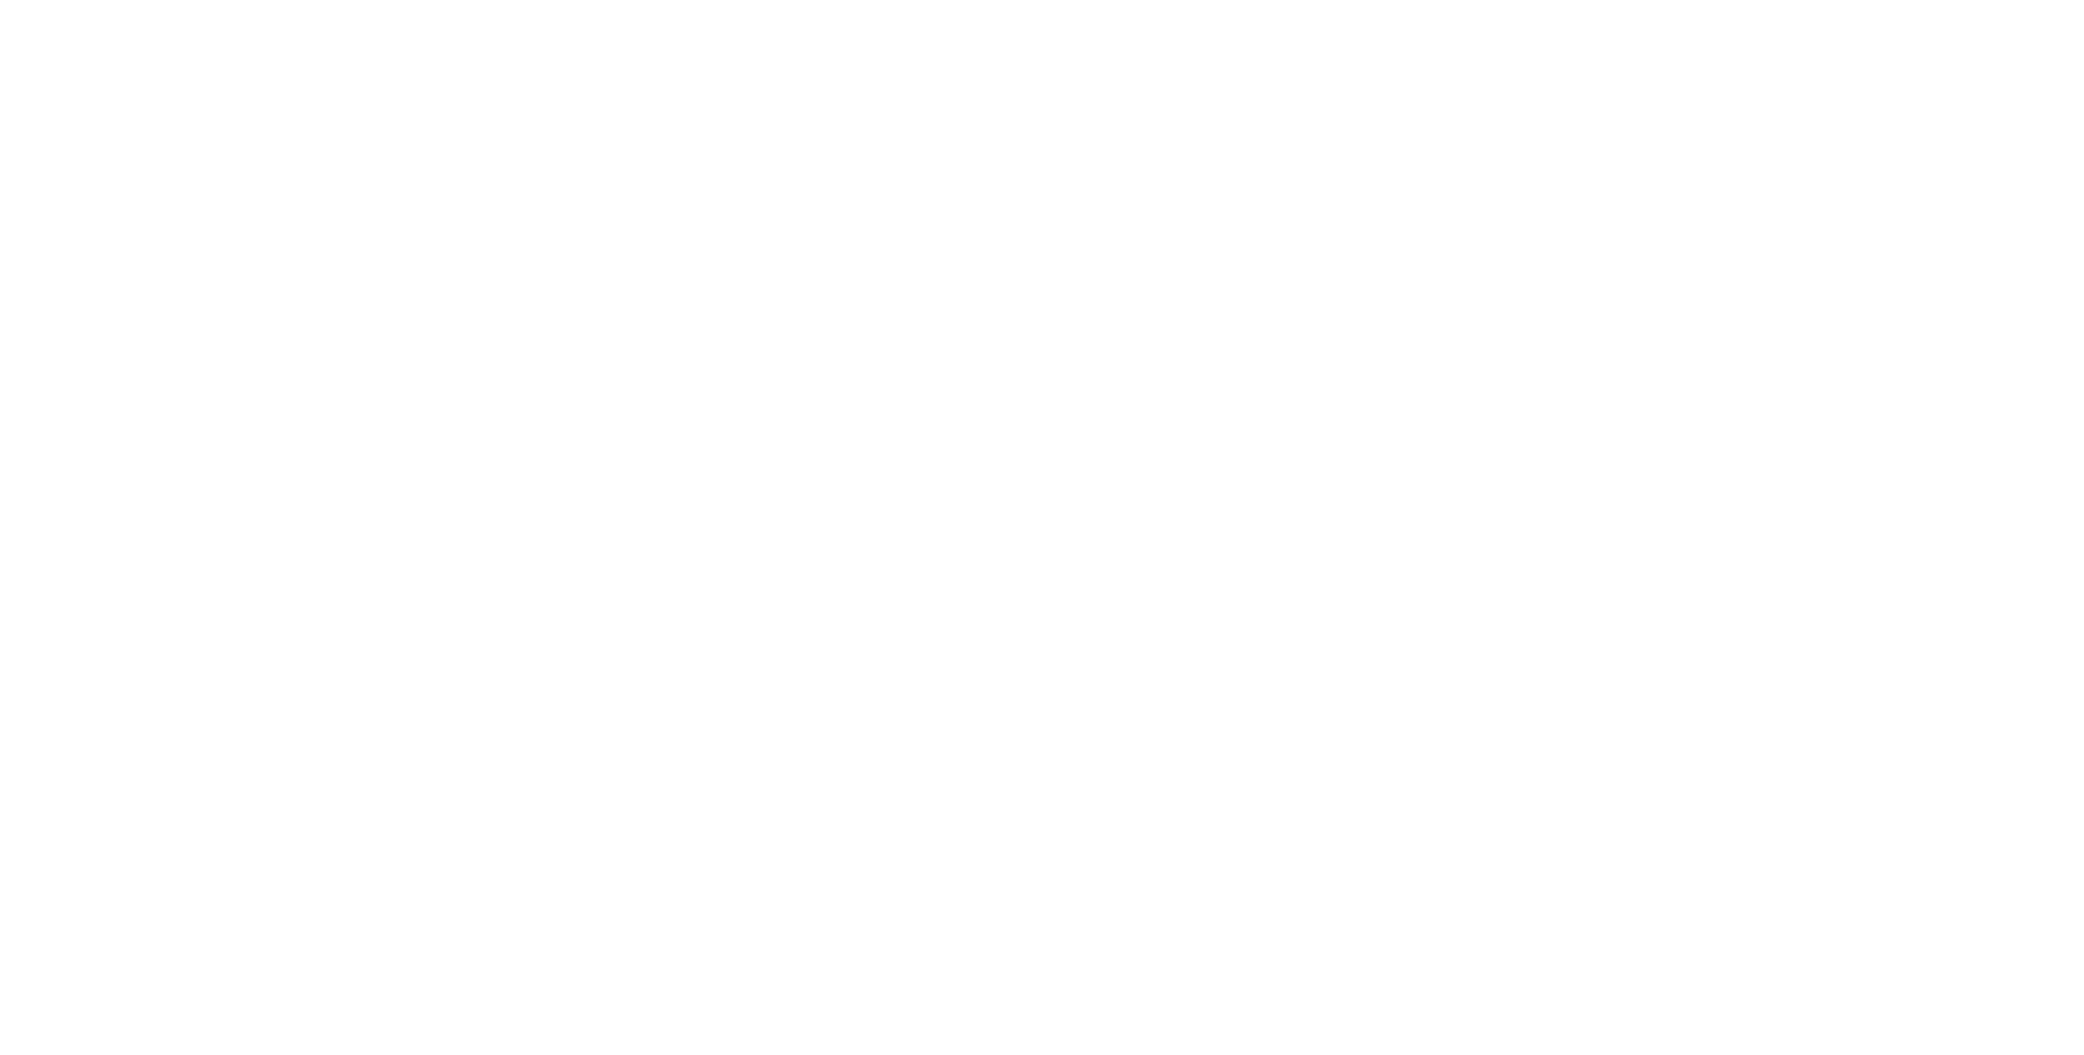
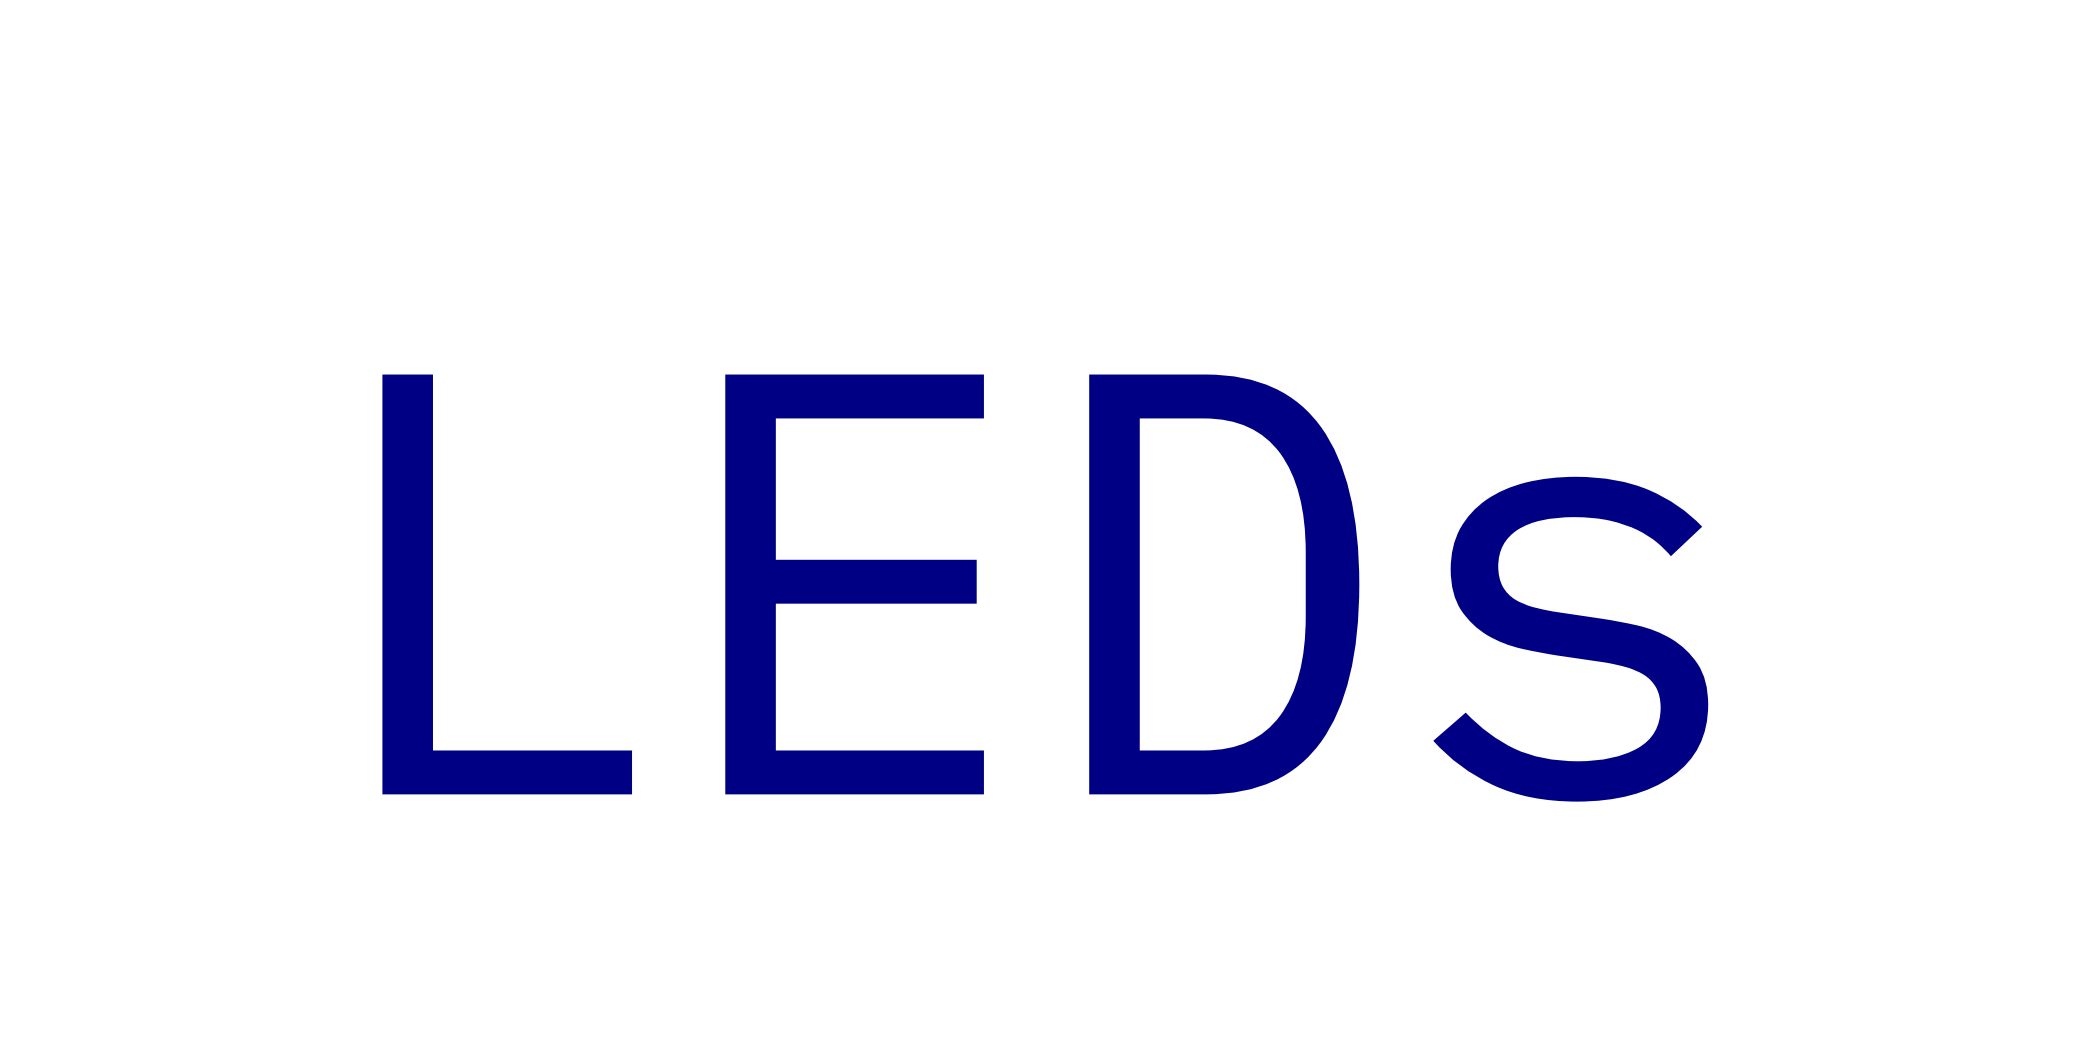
text: none -> LEDs (1045, 588)

